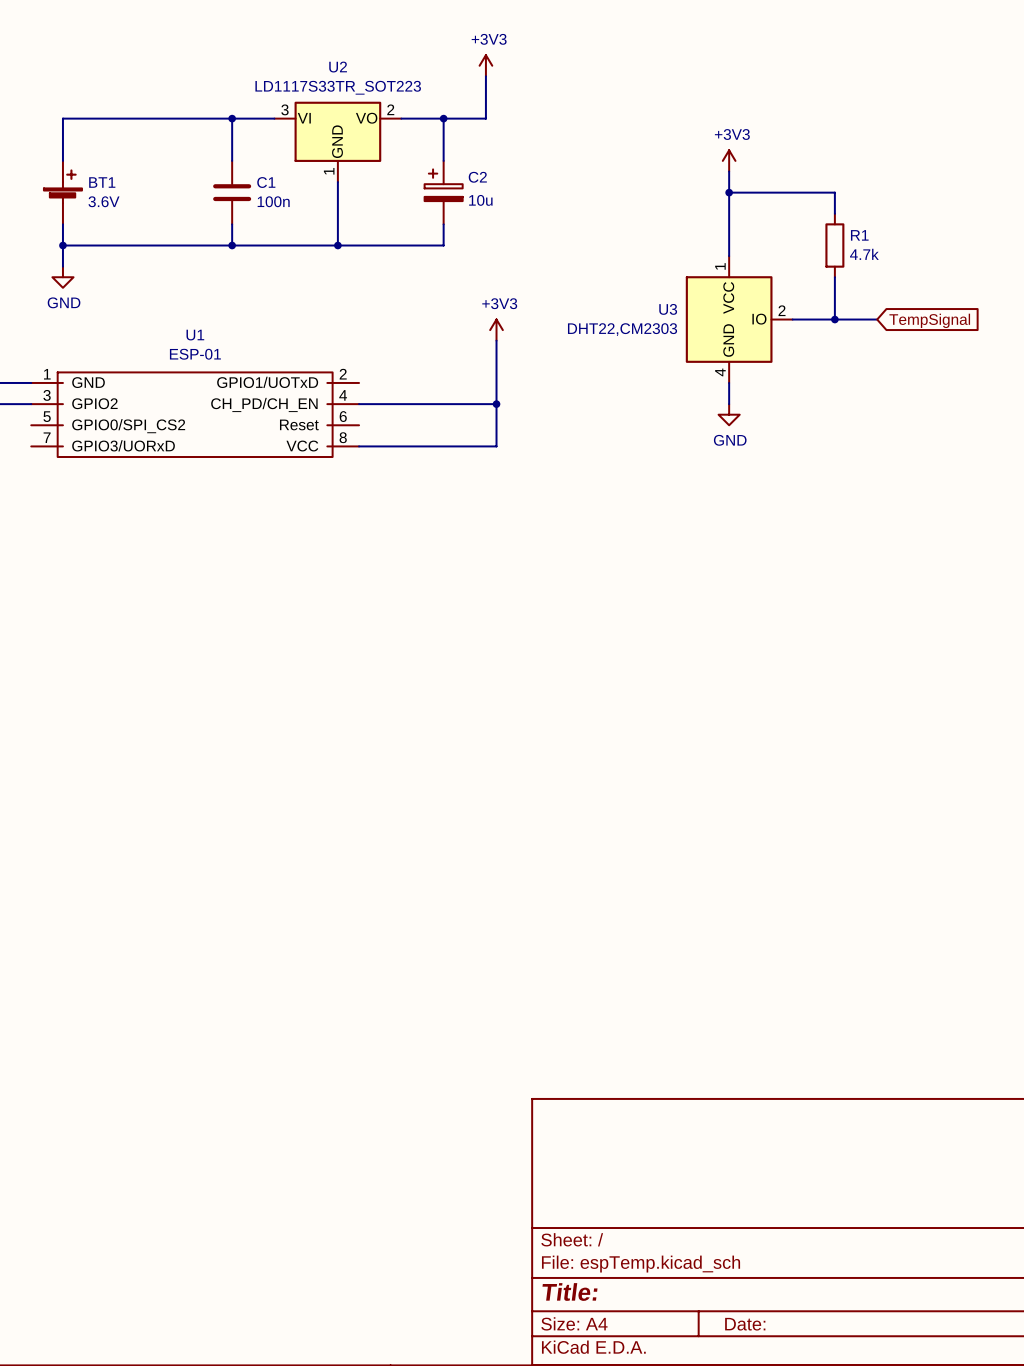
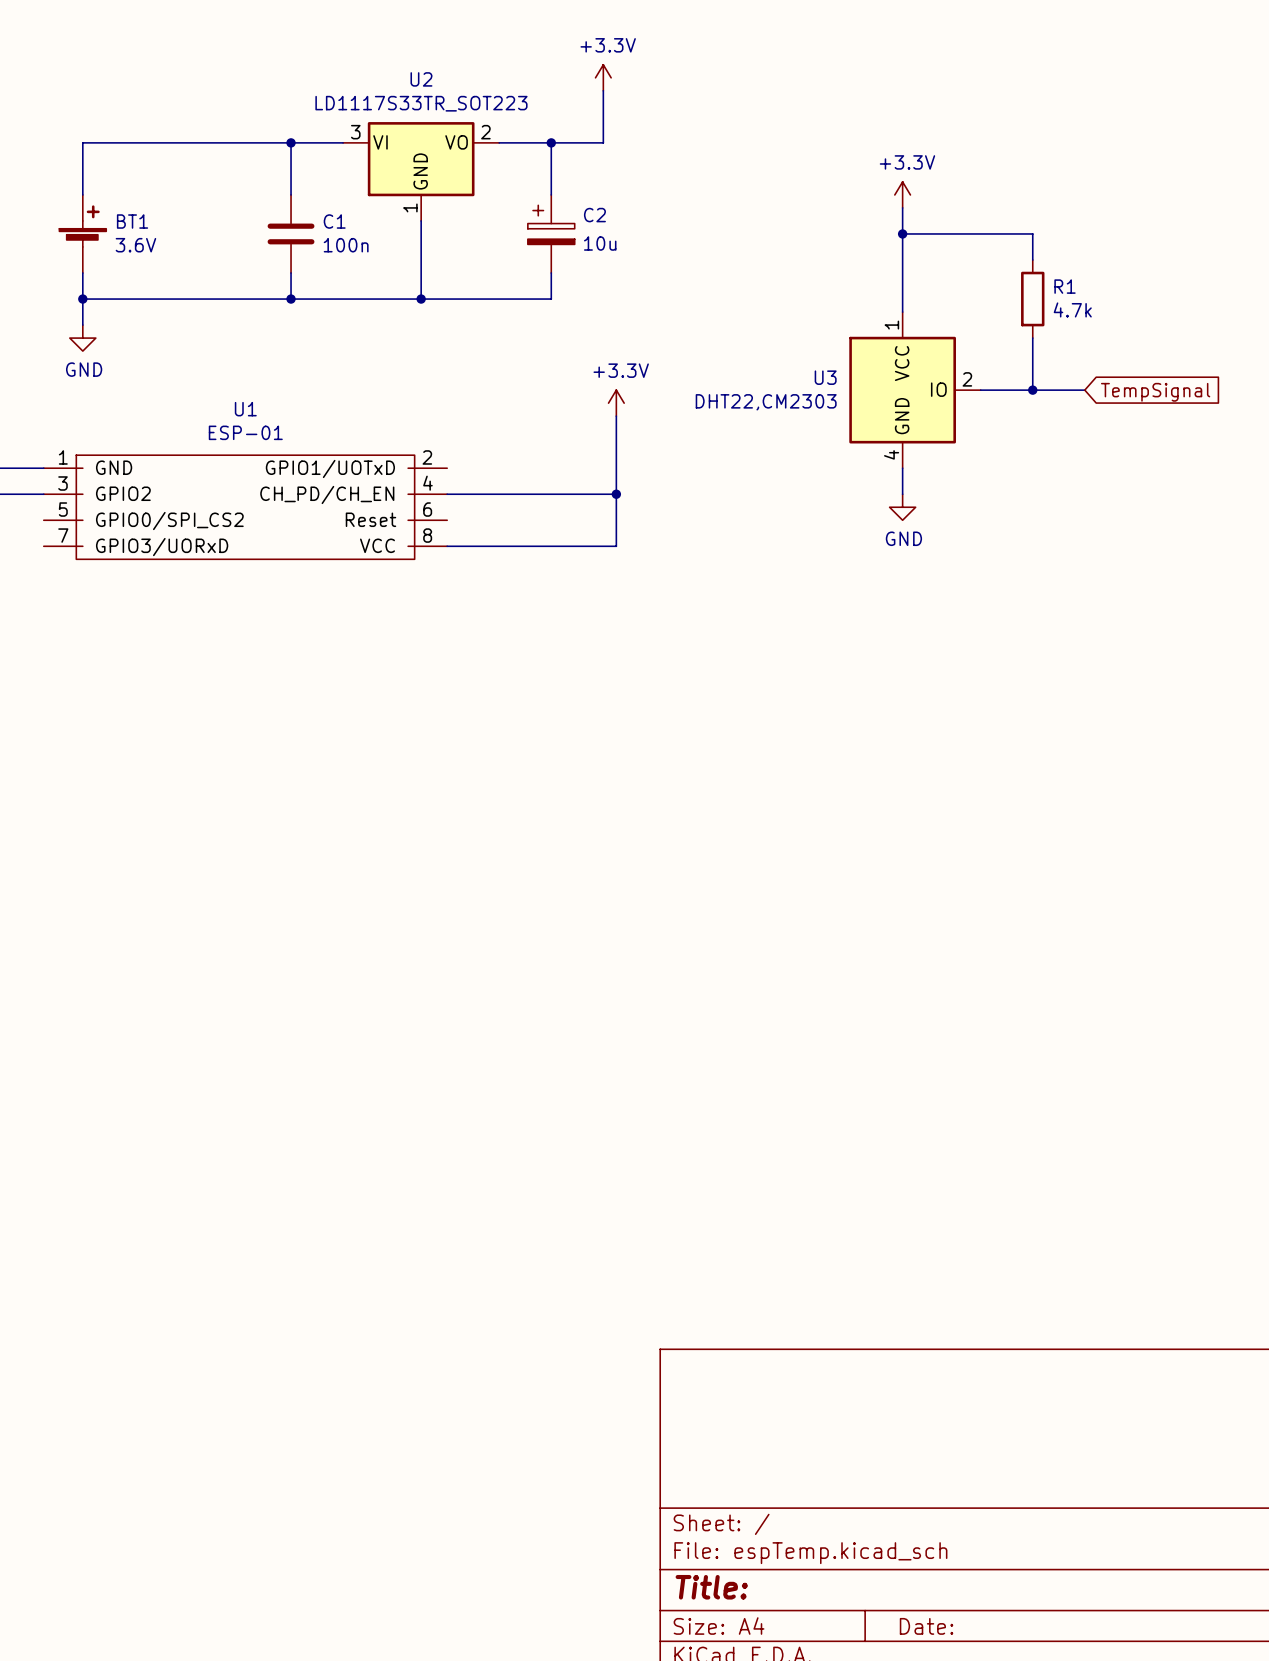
power symbol: +3V3 (485, 65) -> +3.3V (603, 77)
power symbol: +3V3 (729, 160) -> +3.3V (902, 194)
power symbol: +3V3 (496, 330) -> +3.3V (616, 403)

